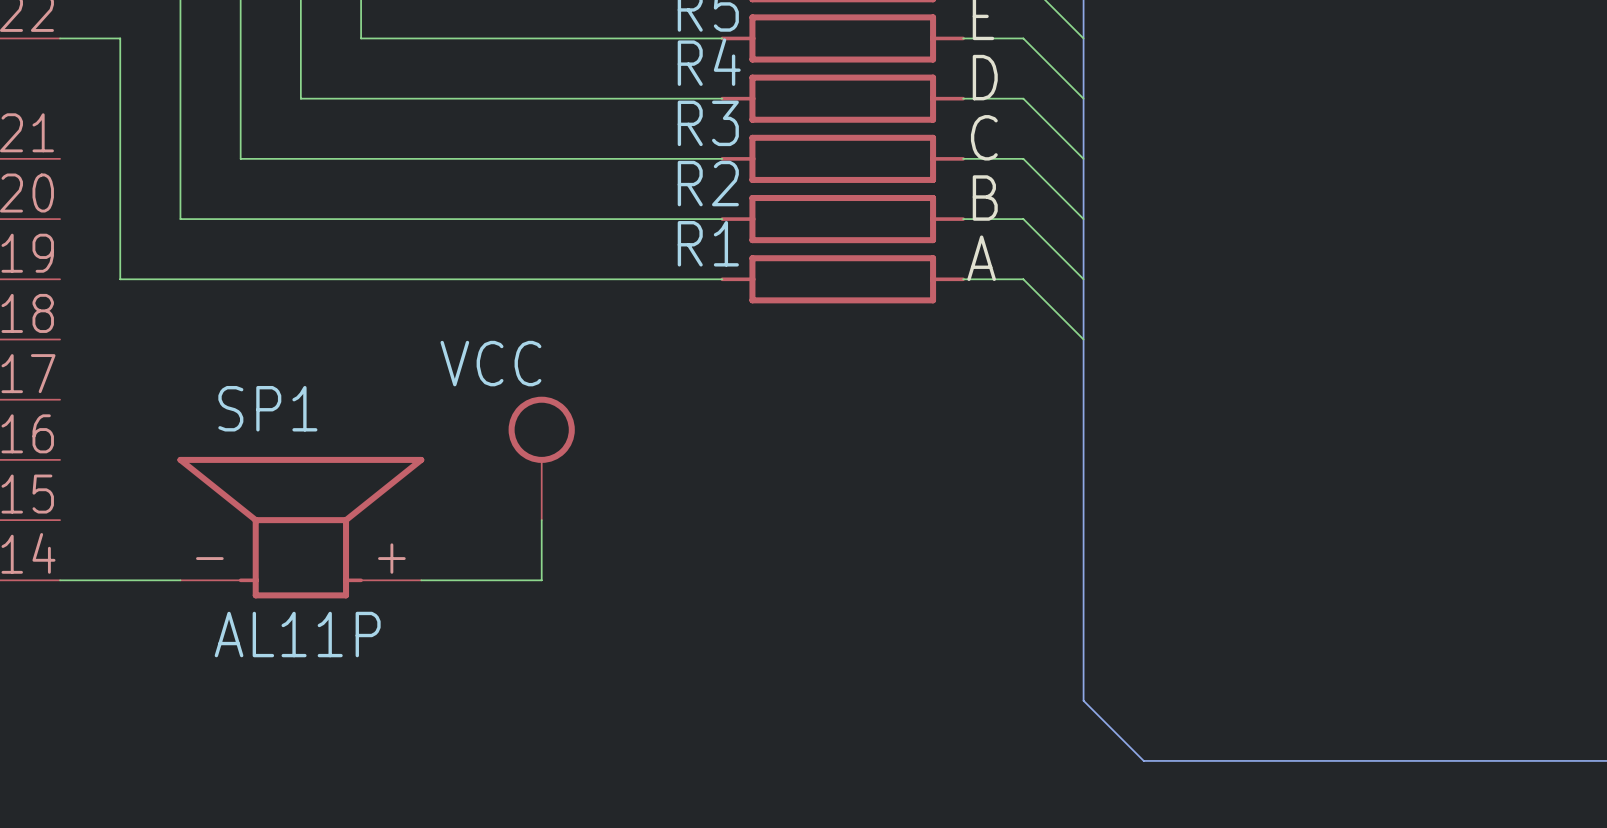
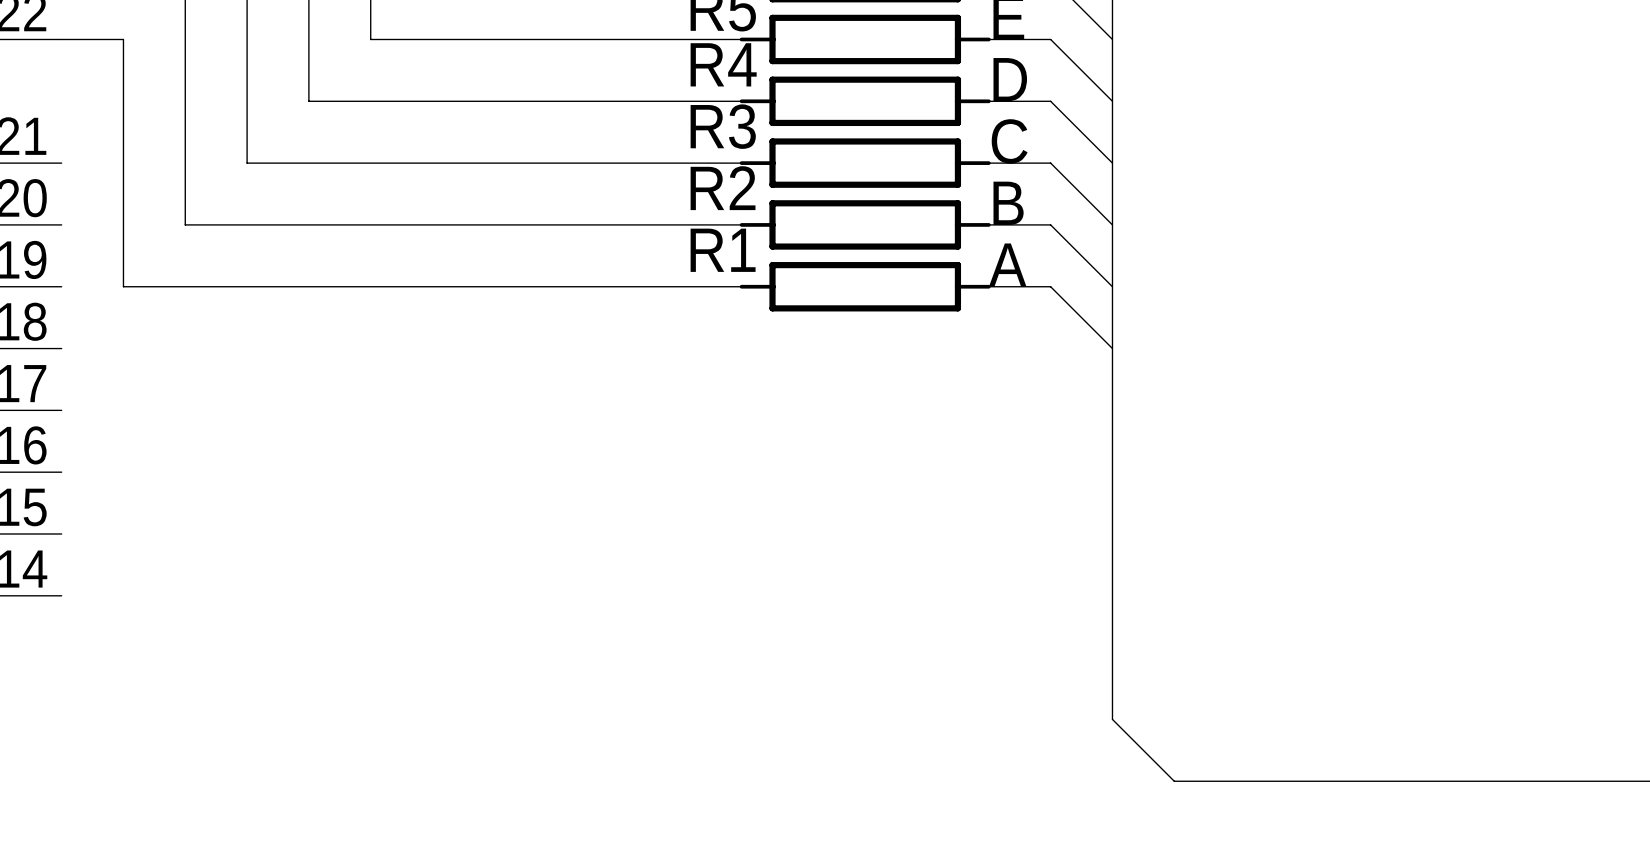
power symbol: VCC (541, 458) -> none
wire: (541, 520) (541, 580) (421, 580) -> none
SP1: AL11P (300, 527) -> none
wire: (60, 580) (180, 580) -> none

